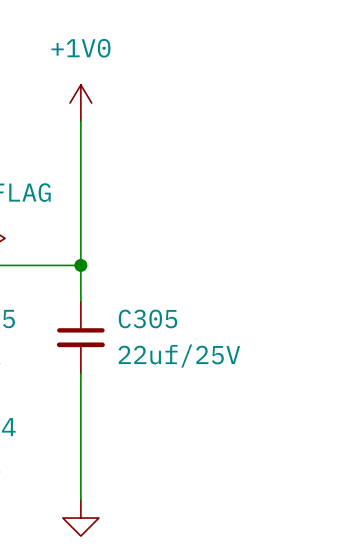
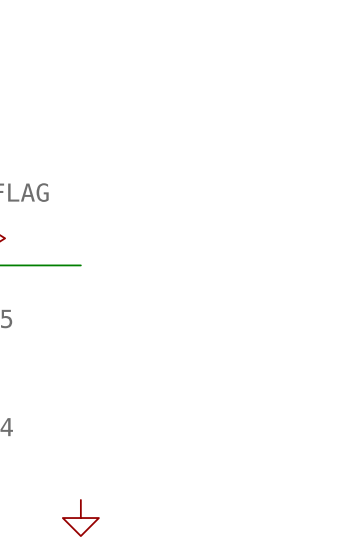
power symbol: +1V0 (80, 103) -> none
wire: (80, 121) (80, 301) -> none
junction: (80, 265) -> none
C305: 22uf/25V (80, 337) -> none
wire: (80, 373) (80, 499) -> none

